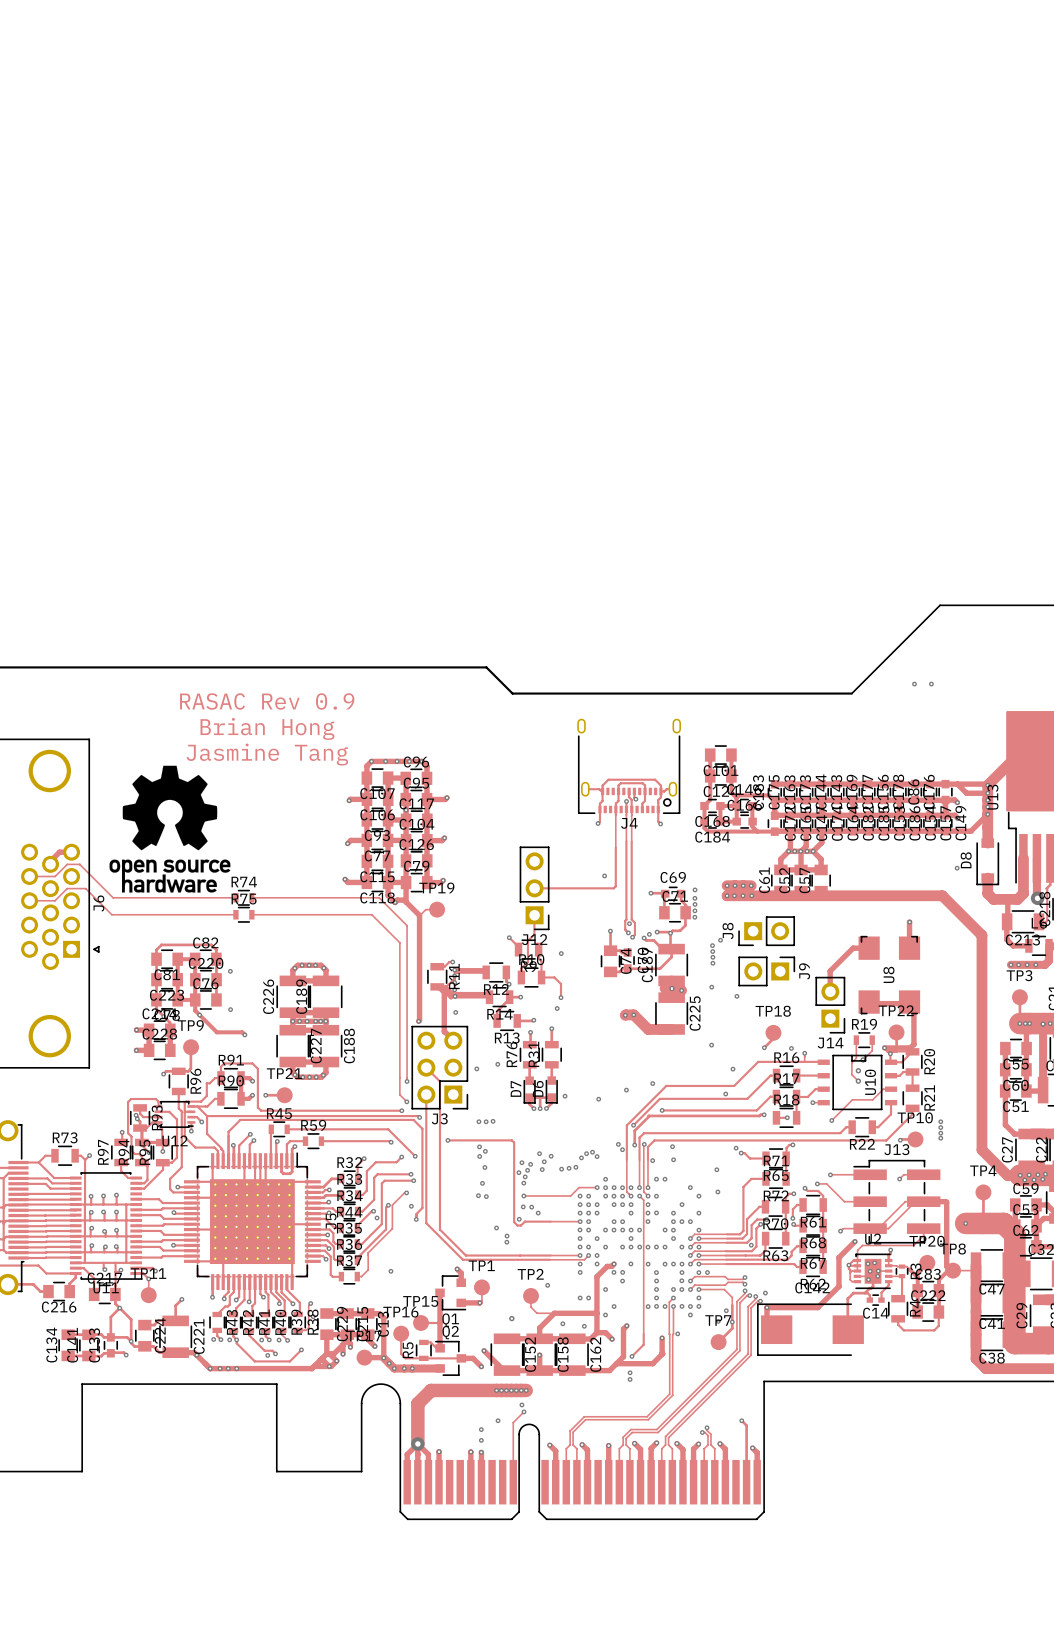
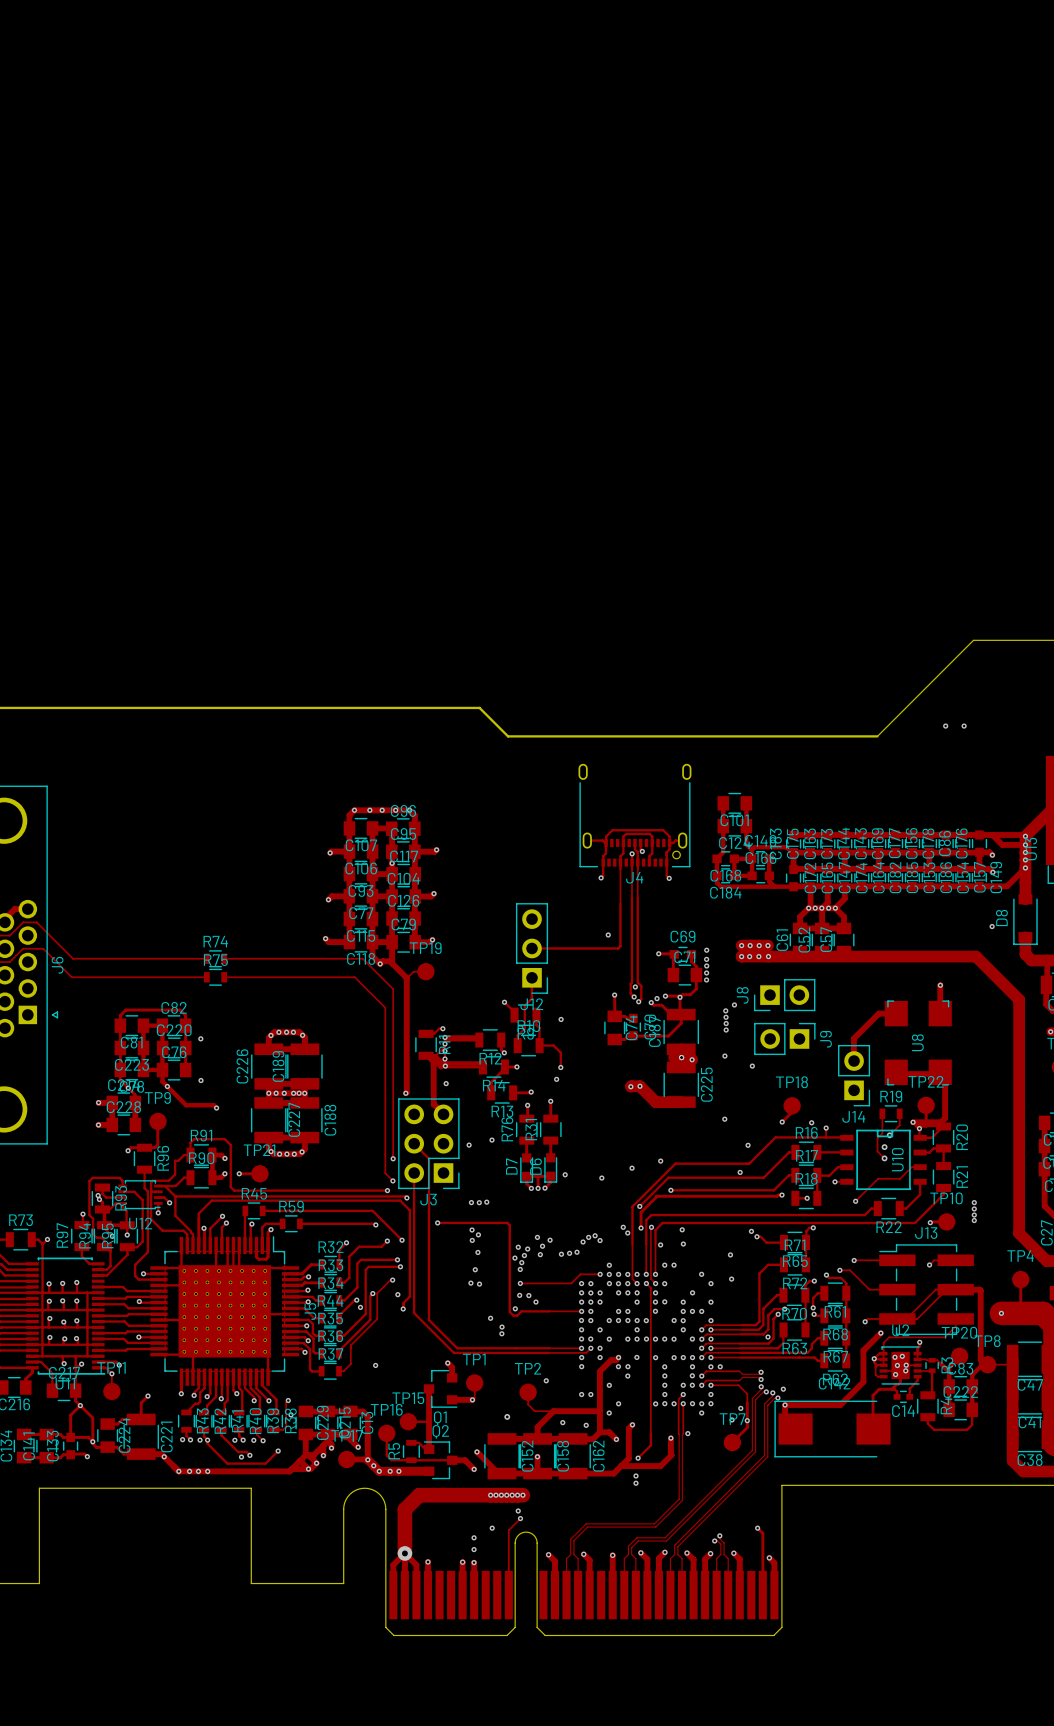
text: RASAC Rev 0.9 (267, 701) -> none
text: Brian Hong (267, 728) -> none
text: Jasmine Tang (267, 754) -> none
drawing: [109, 765, 231, 893] -> none

